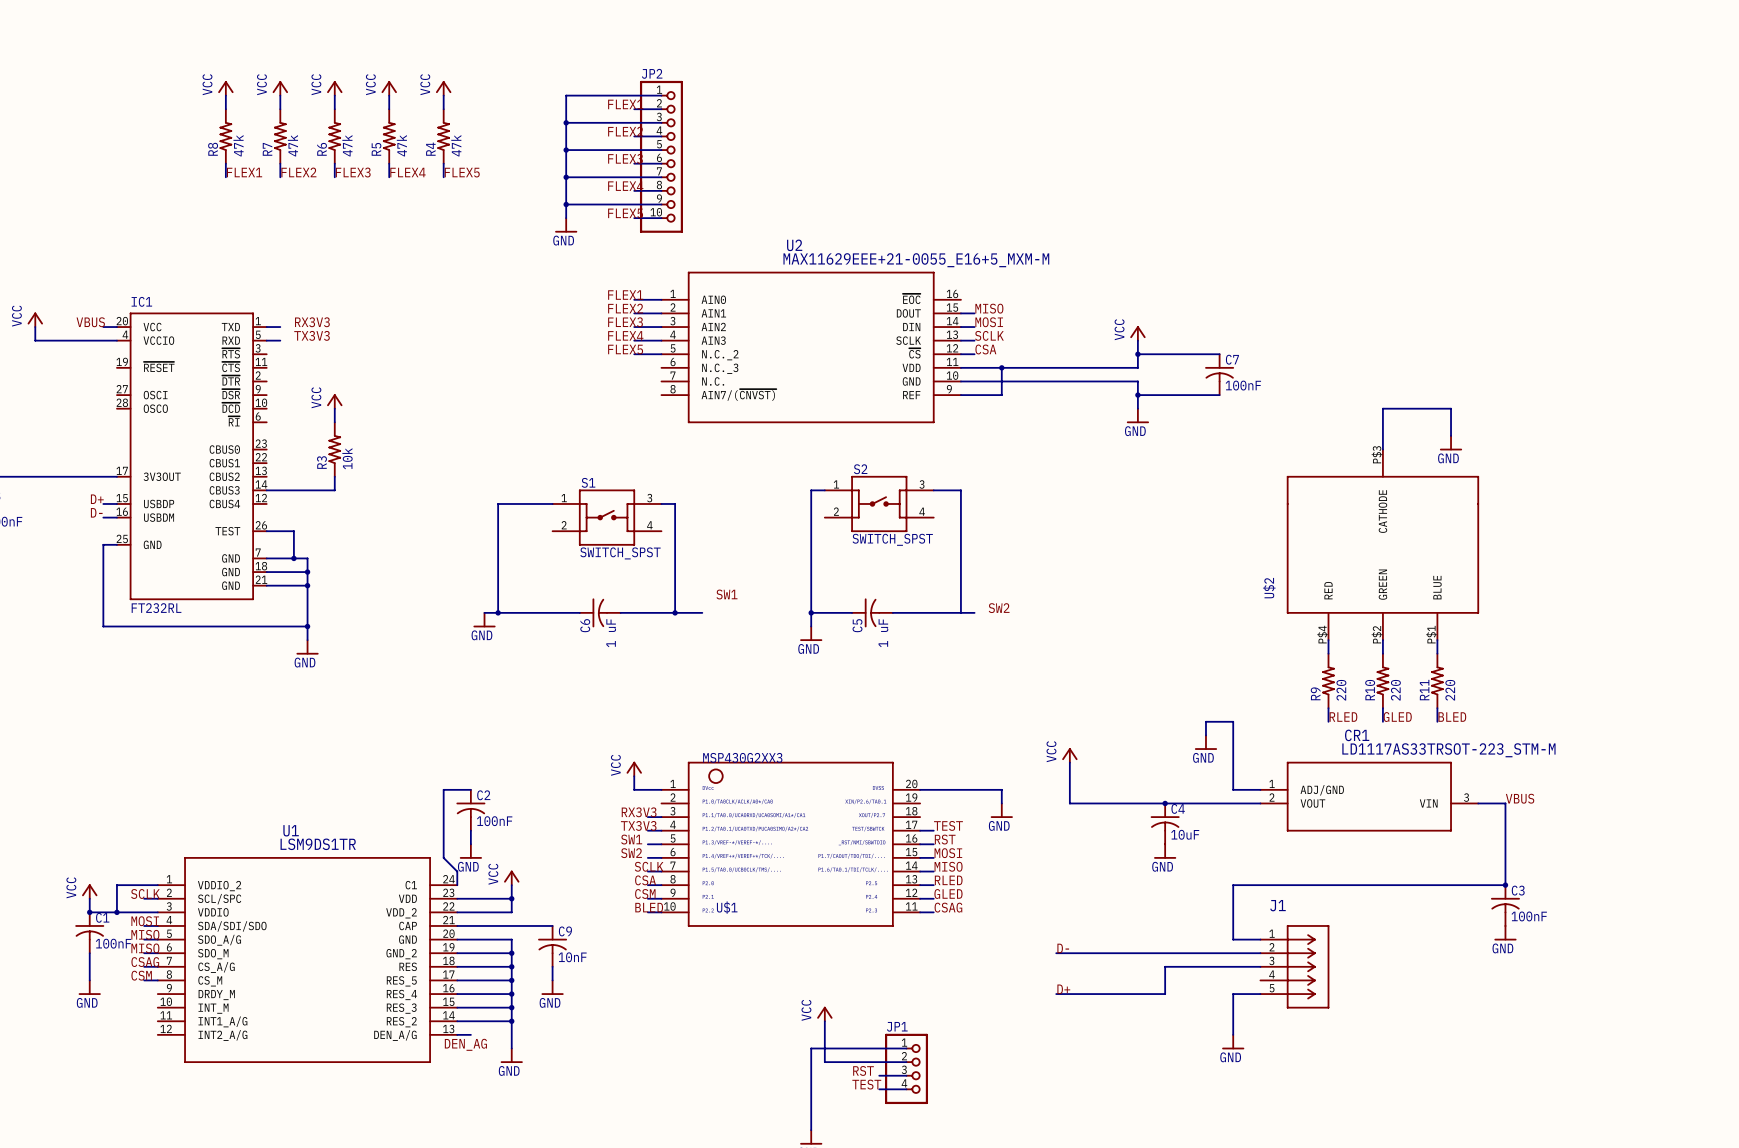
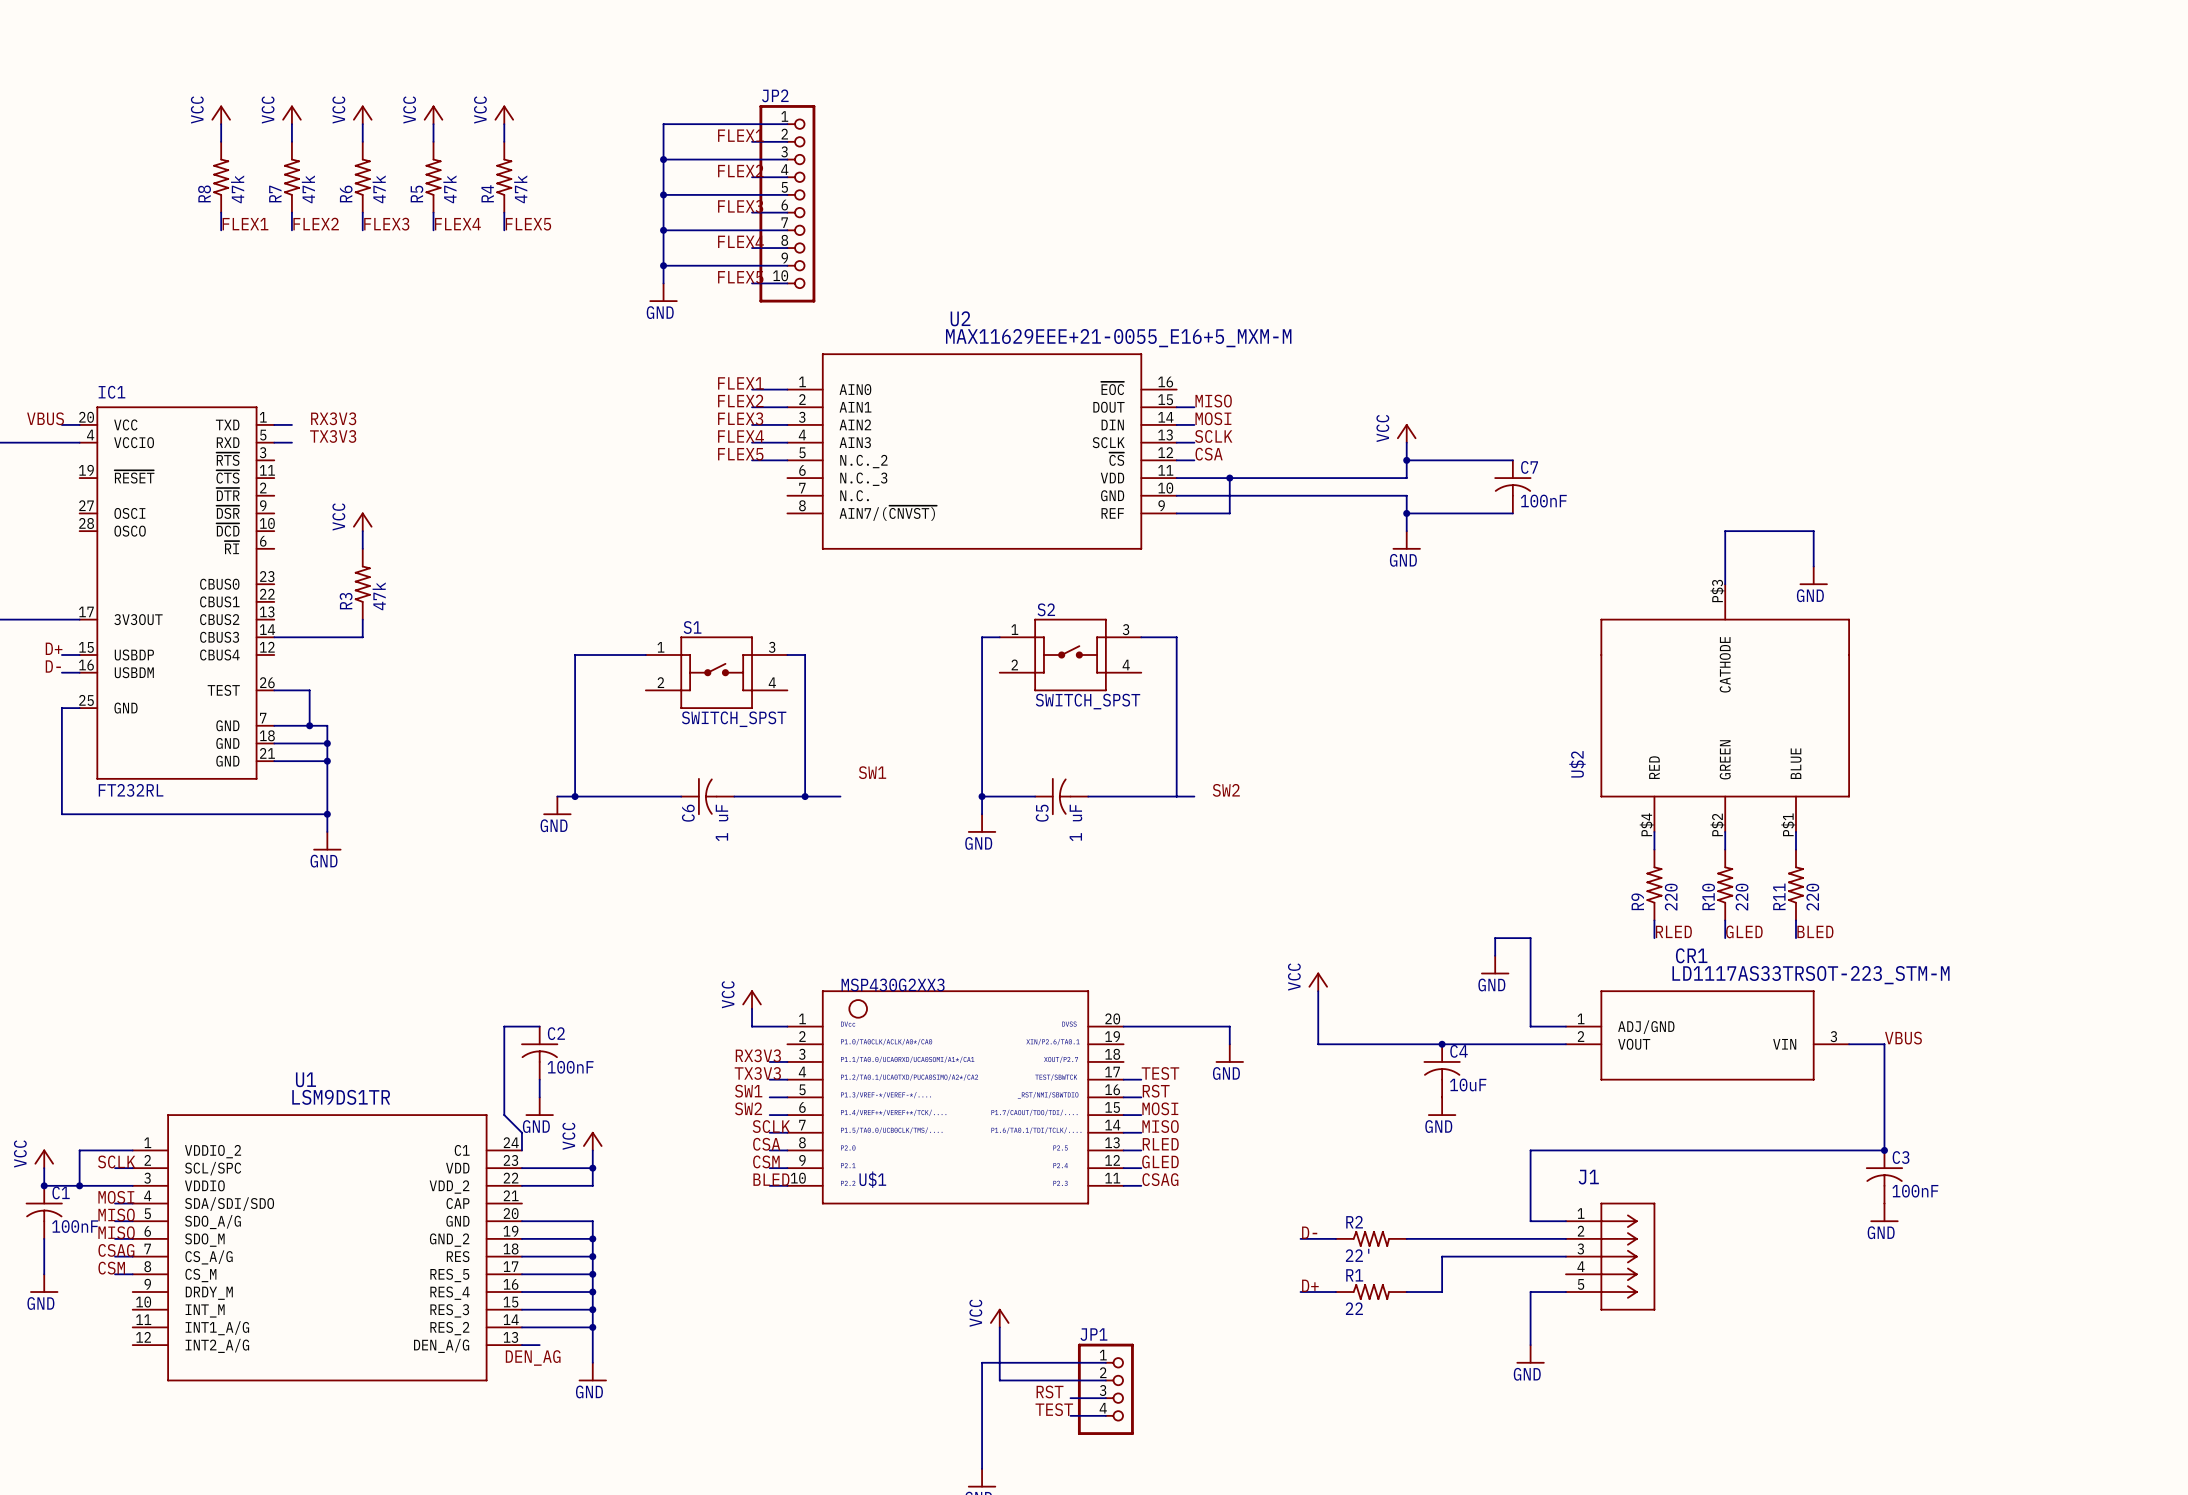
R3 value: 10k (347, 458) -> 47k (379, 596)
wire: (457, 925) (552, 925) -> none
C9: 10nF (552, 946) -> none
R2: none -> 22' (1371, 1238)
wire: (552, 966) (552, 980) -> none
power symbol: GND (552, 987) -> none
R1: none -> 22 (1371, 1292)

